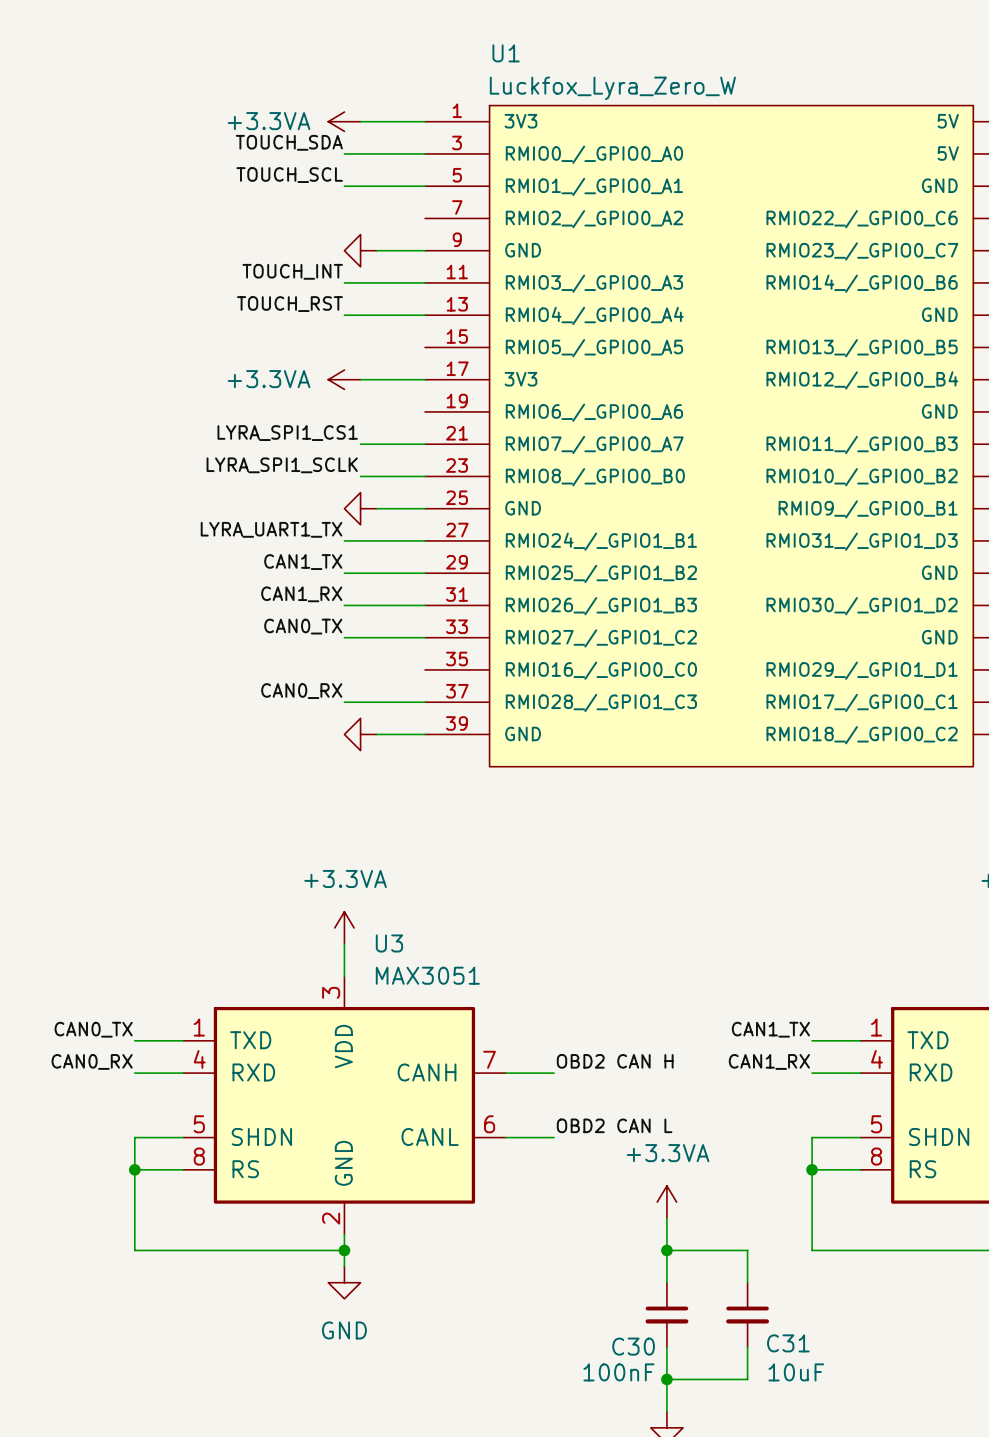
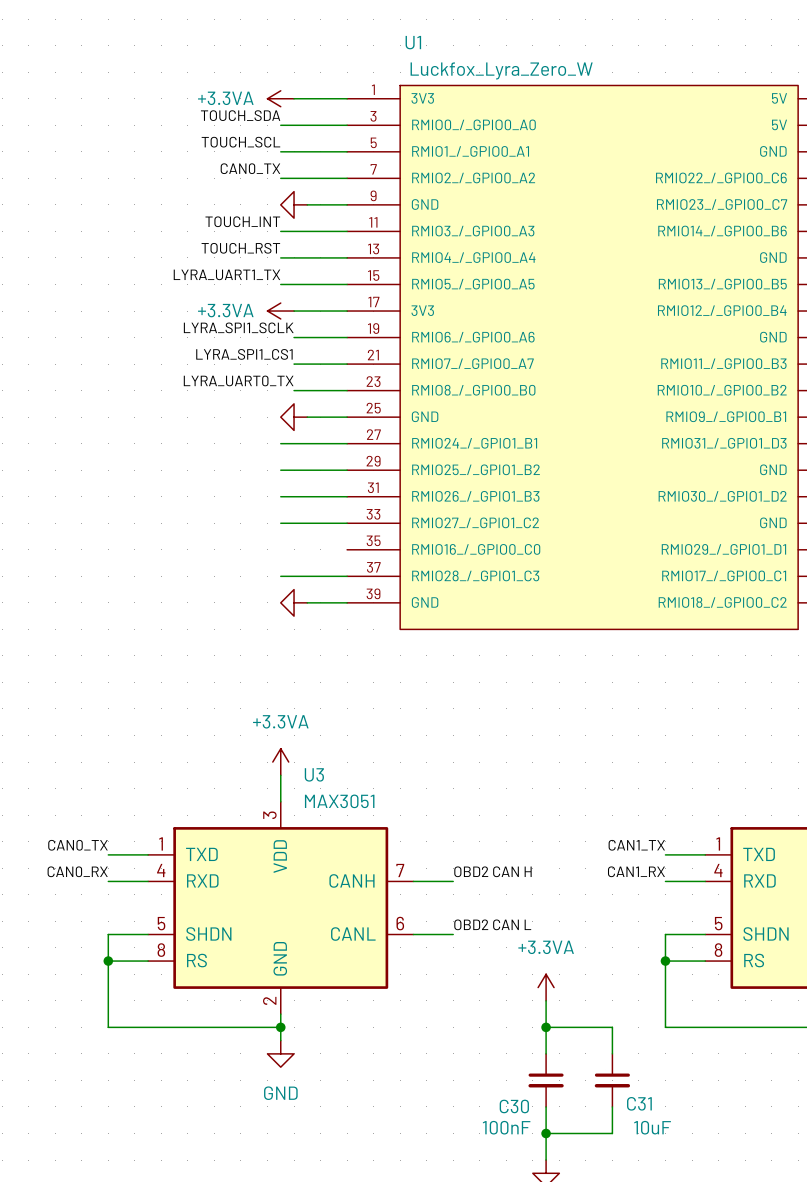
label: none -> CAN0_TX (250, 168)
wire: none -> (280, 178) (347, 178)
wire: none -> (280, 284) (347, 284)
label: none -> LYRA_SPI1_SCLK (238, 327)
wire: none -> (294, 337) (347, 337)
label: LYRA_SPI1_SCLK (282, 465) -> LYRA_UART0_TX (238, 380)
label position: LYRA_UART1_TX (271, 529) -> LYRA_UART1_TX (226, 274)
label: CAN1_TX (303, 562) -> none
label: CAN1_RX (301, 594) -> none
label: CAN0_TX (303, 626) -> none
label: CAN0_RX (301, 691) -> none

